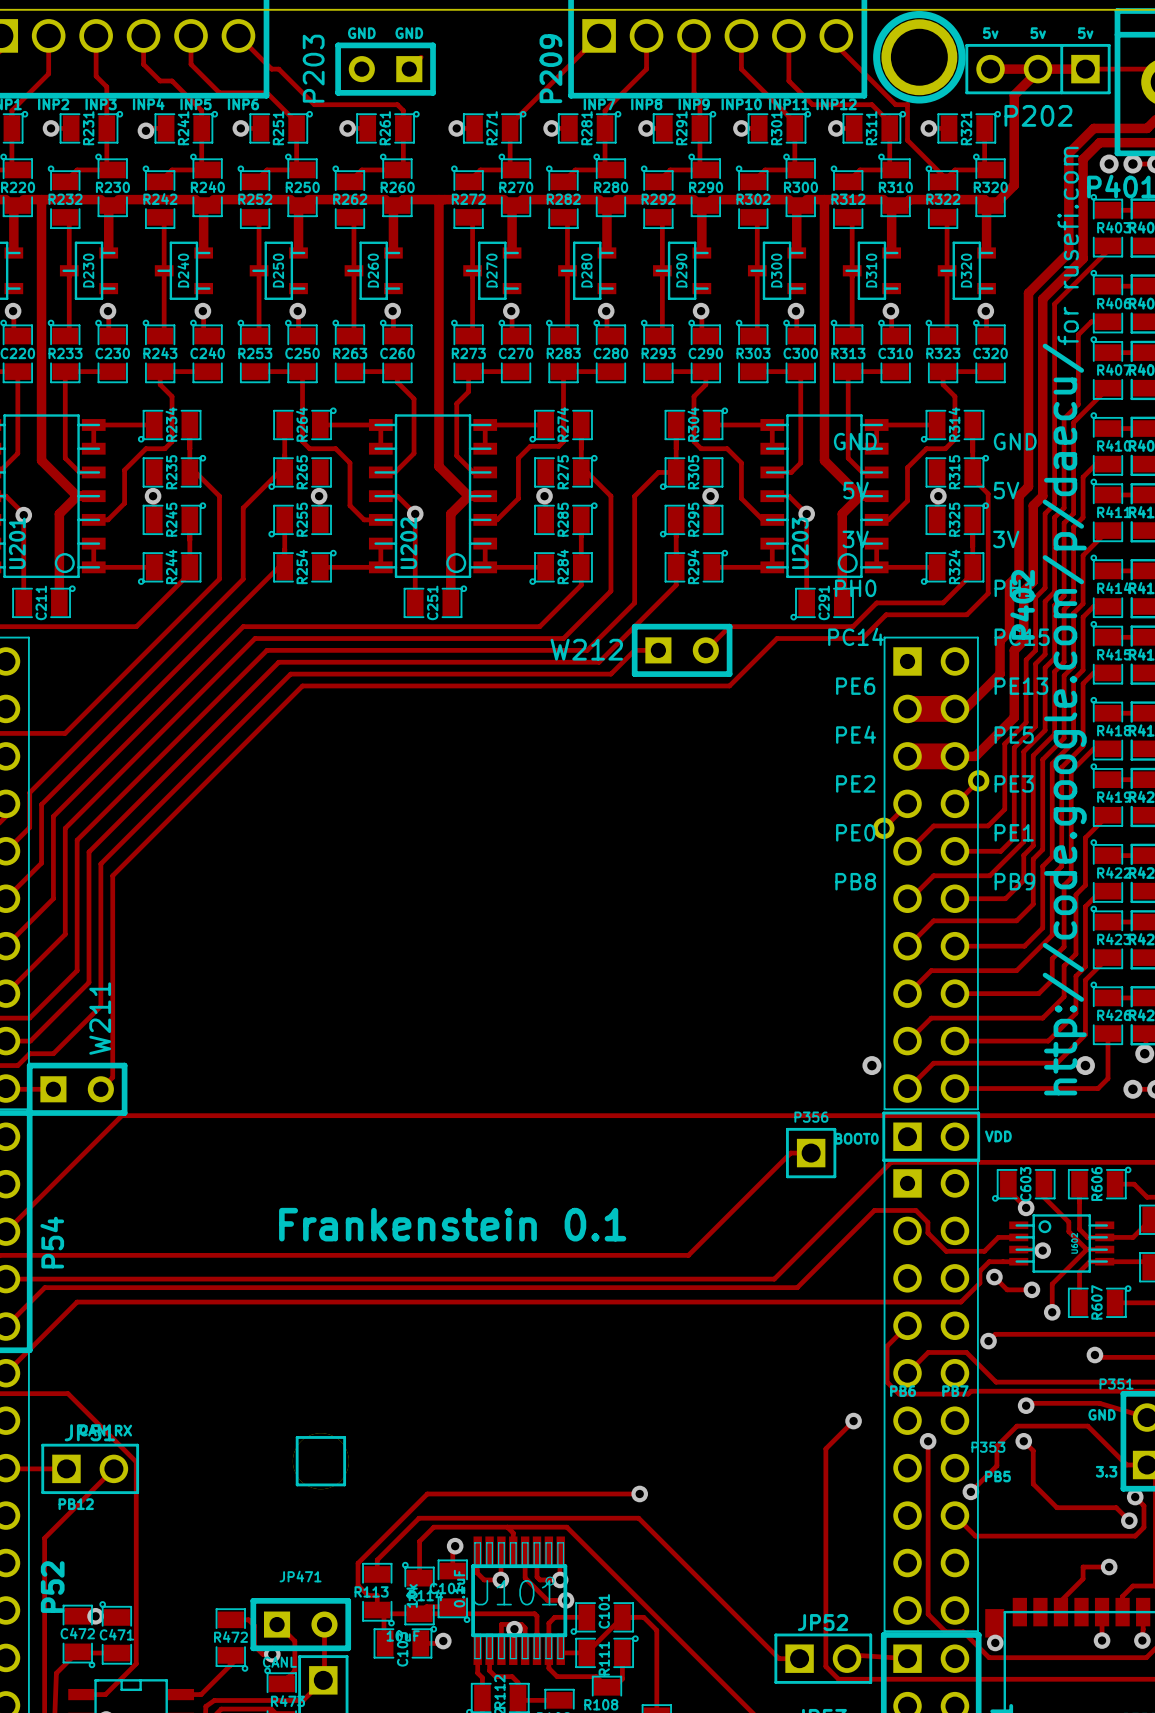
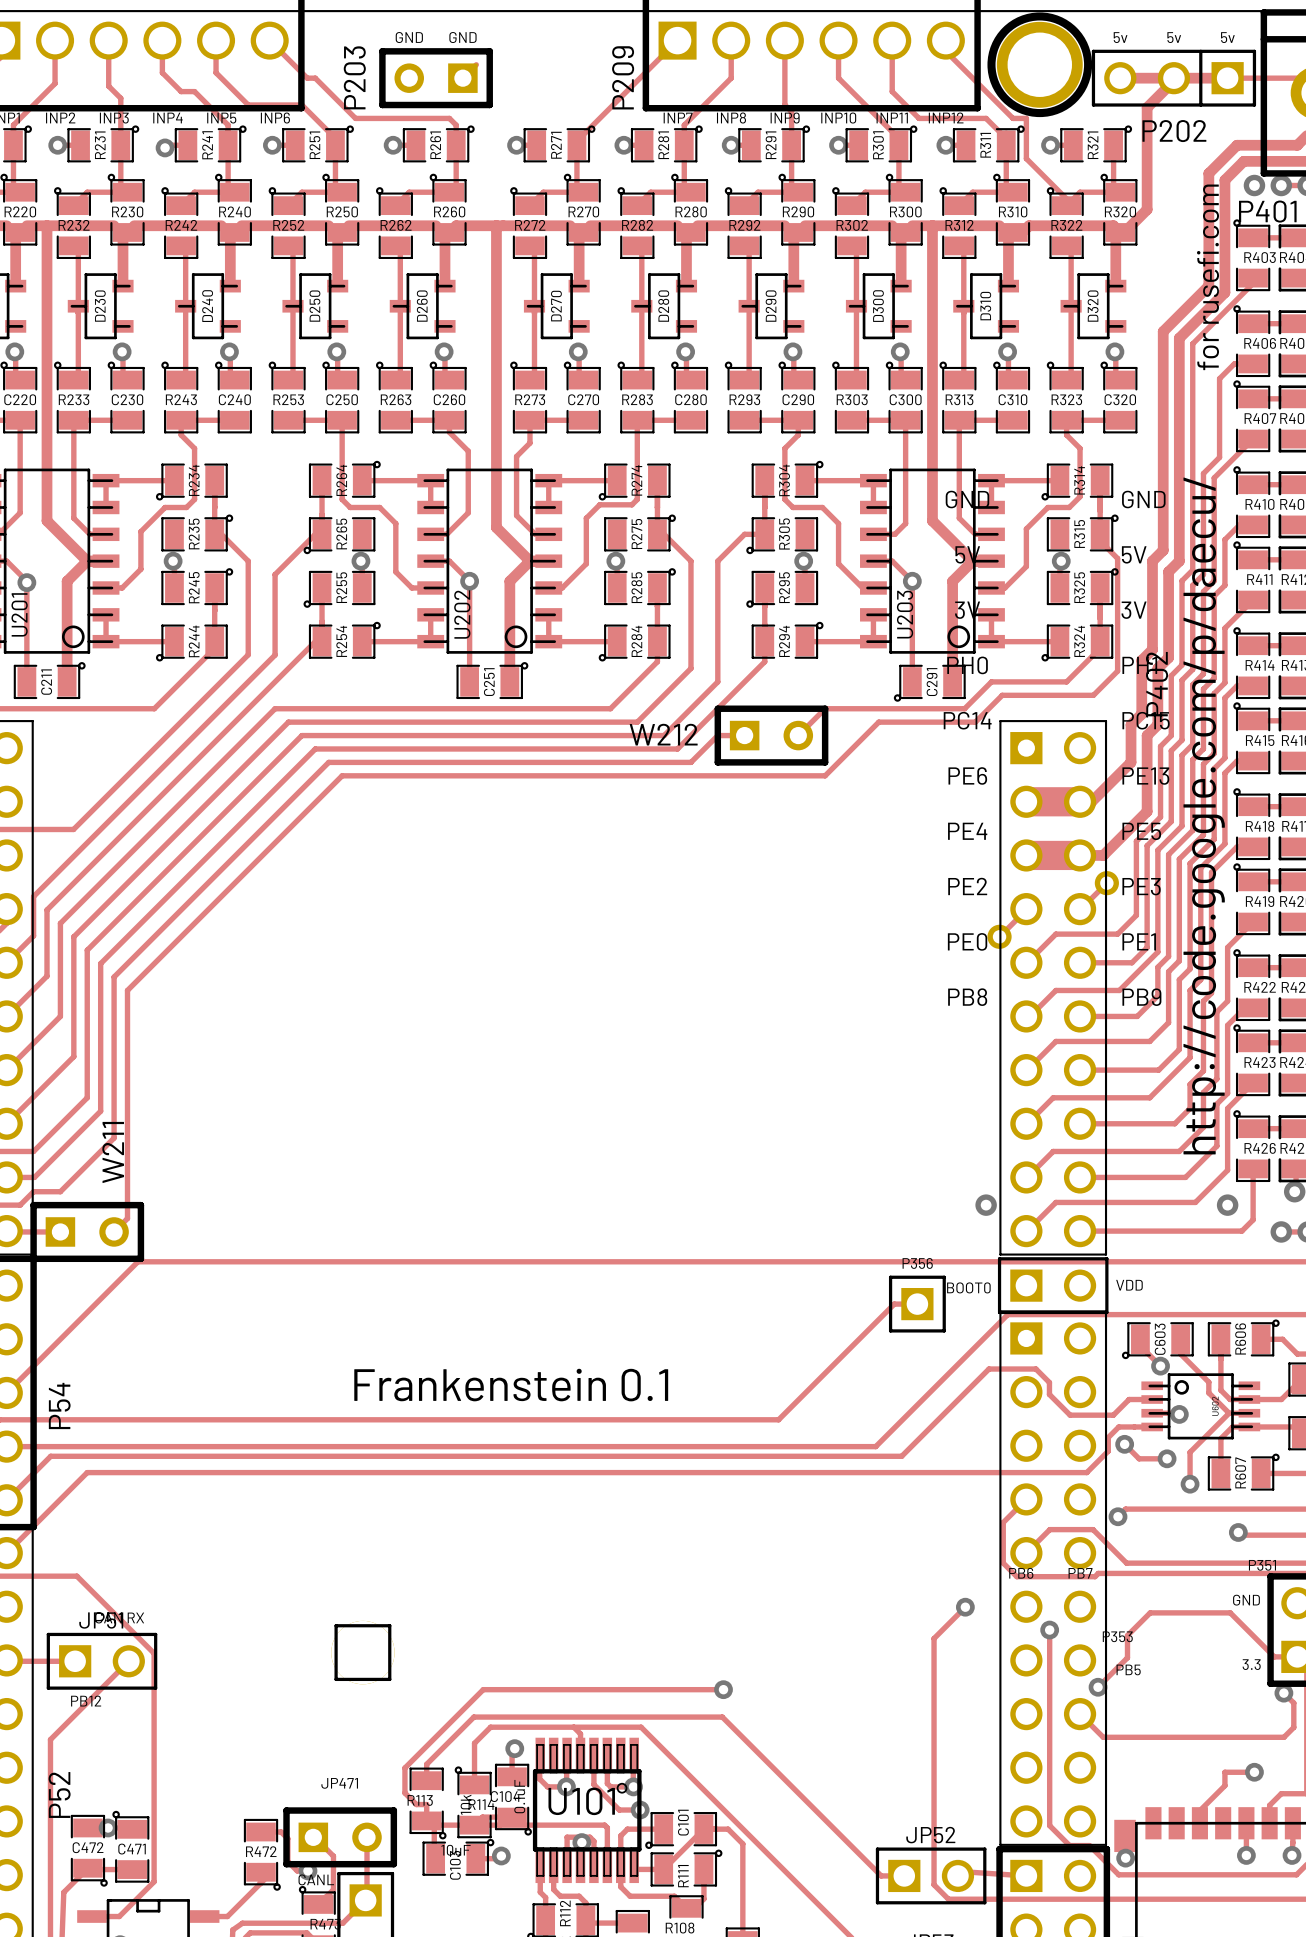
track: (1026, 1405) (1028, 1403) (1099, 1403) (1147, 1417) -> none
via: (1026, 1405) -> none
track: (1023, 1441) (1033, 1450) (1033, 1483) (1056, 1507) (1116, 1507) (1129, 1520) -> none
via: (1023, 1441) -> none
via: (1129, 1520) -> none

